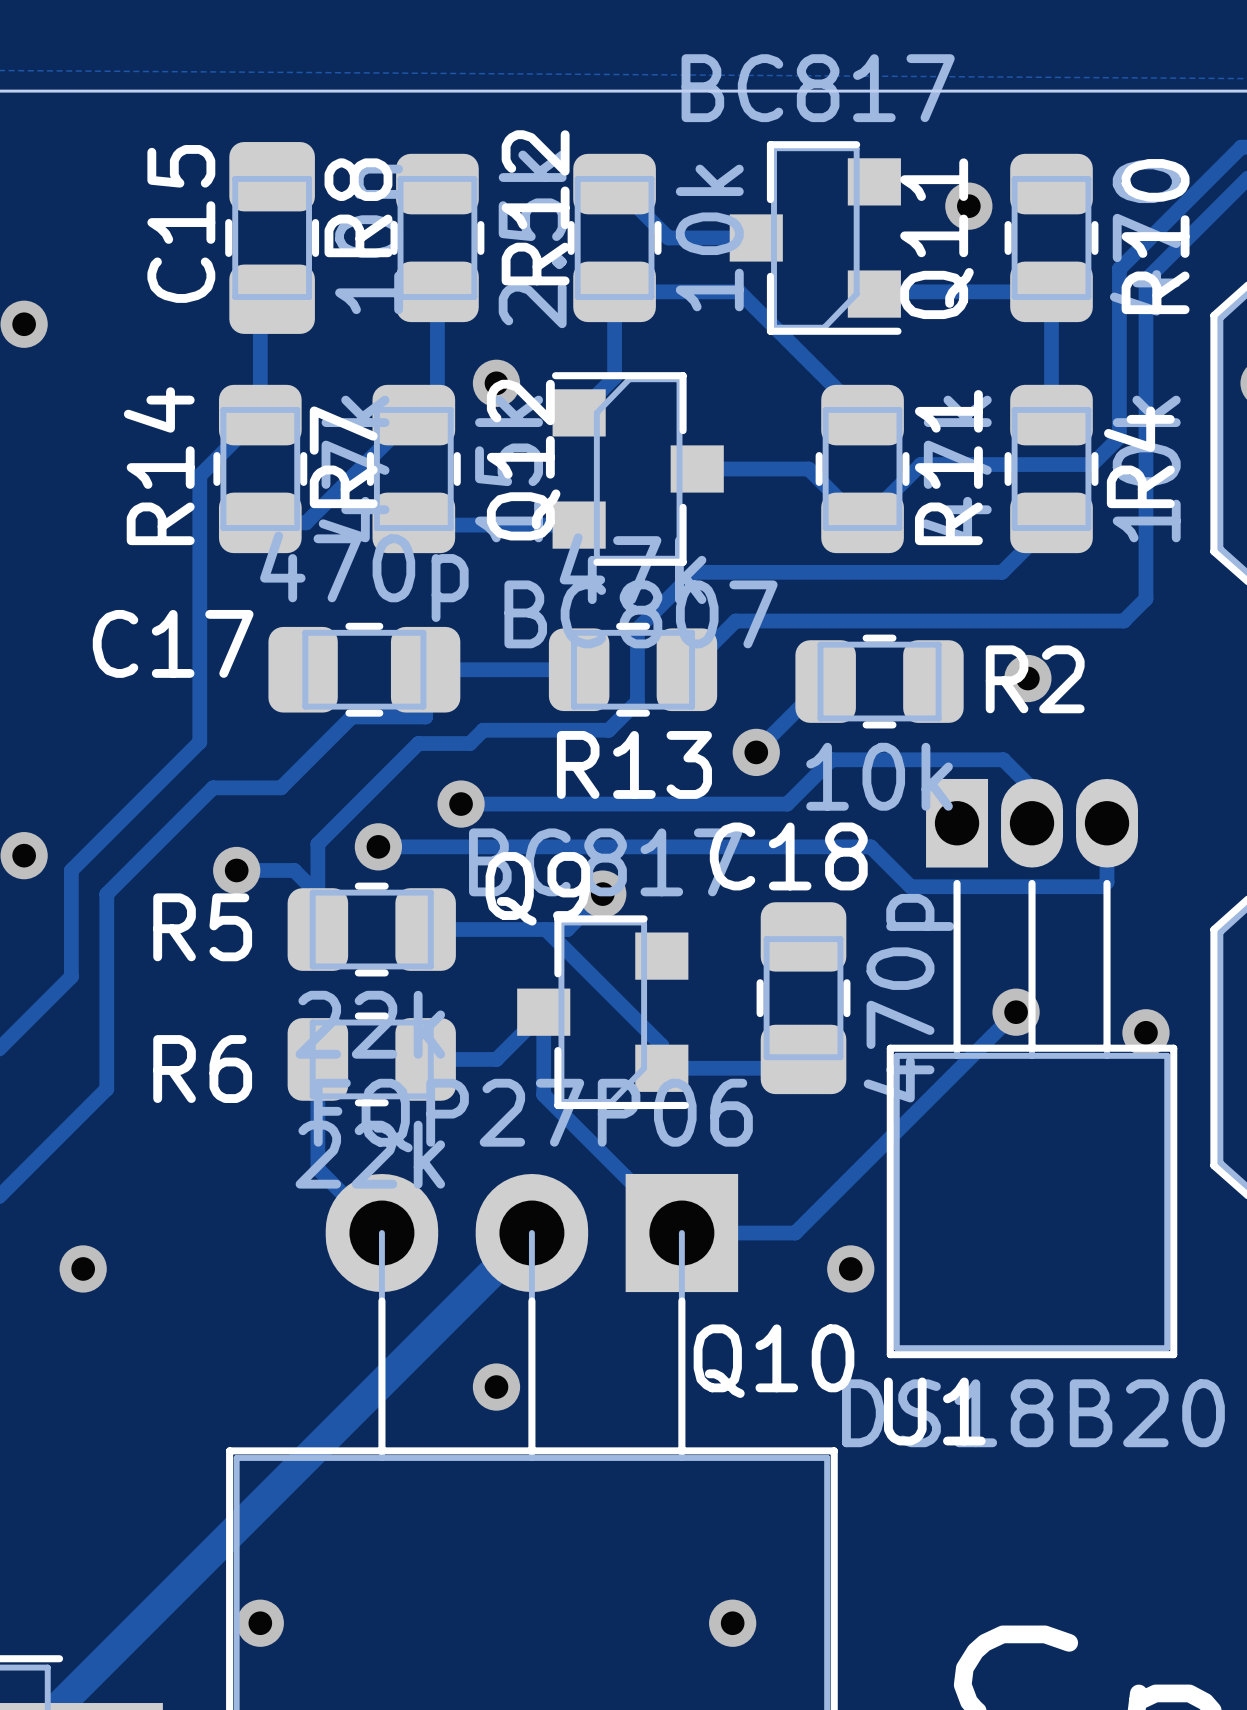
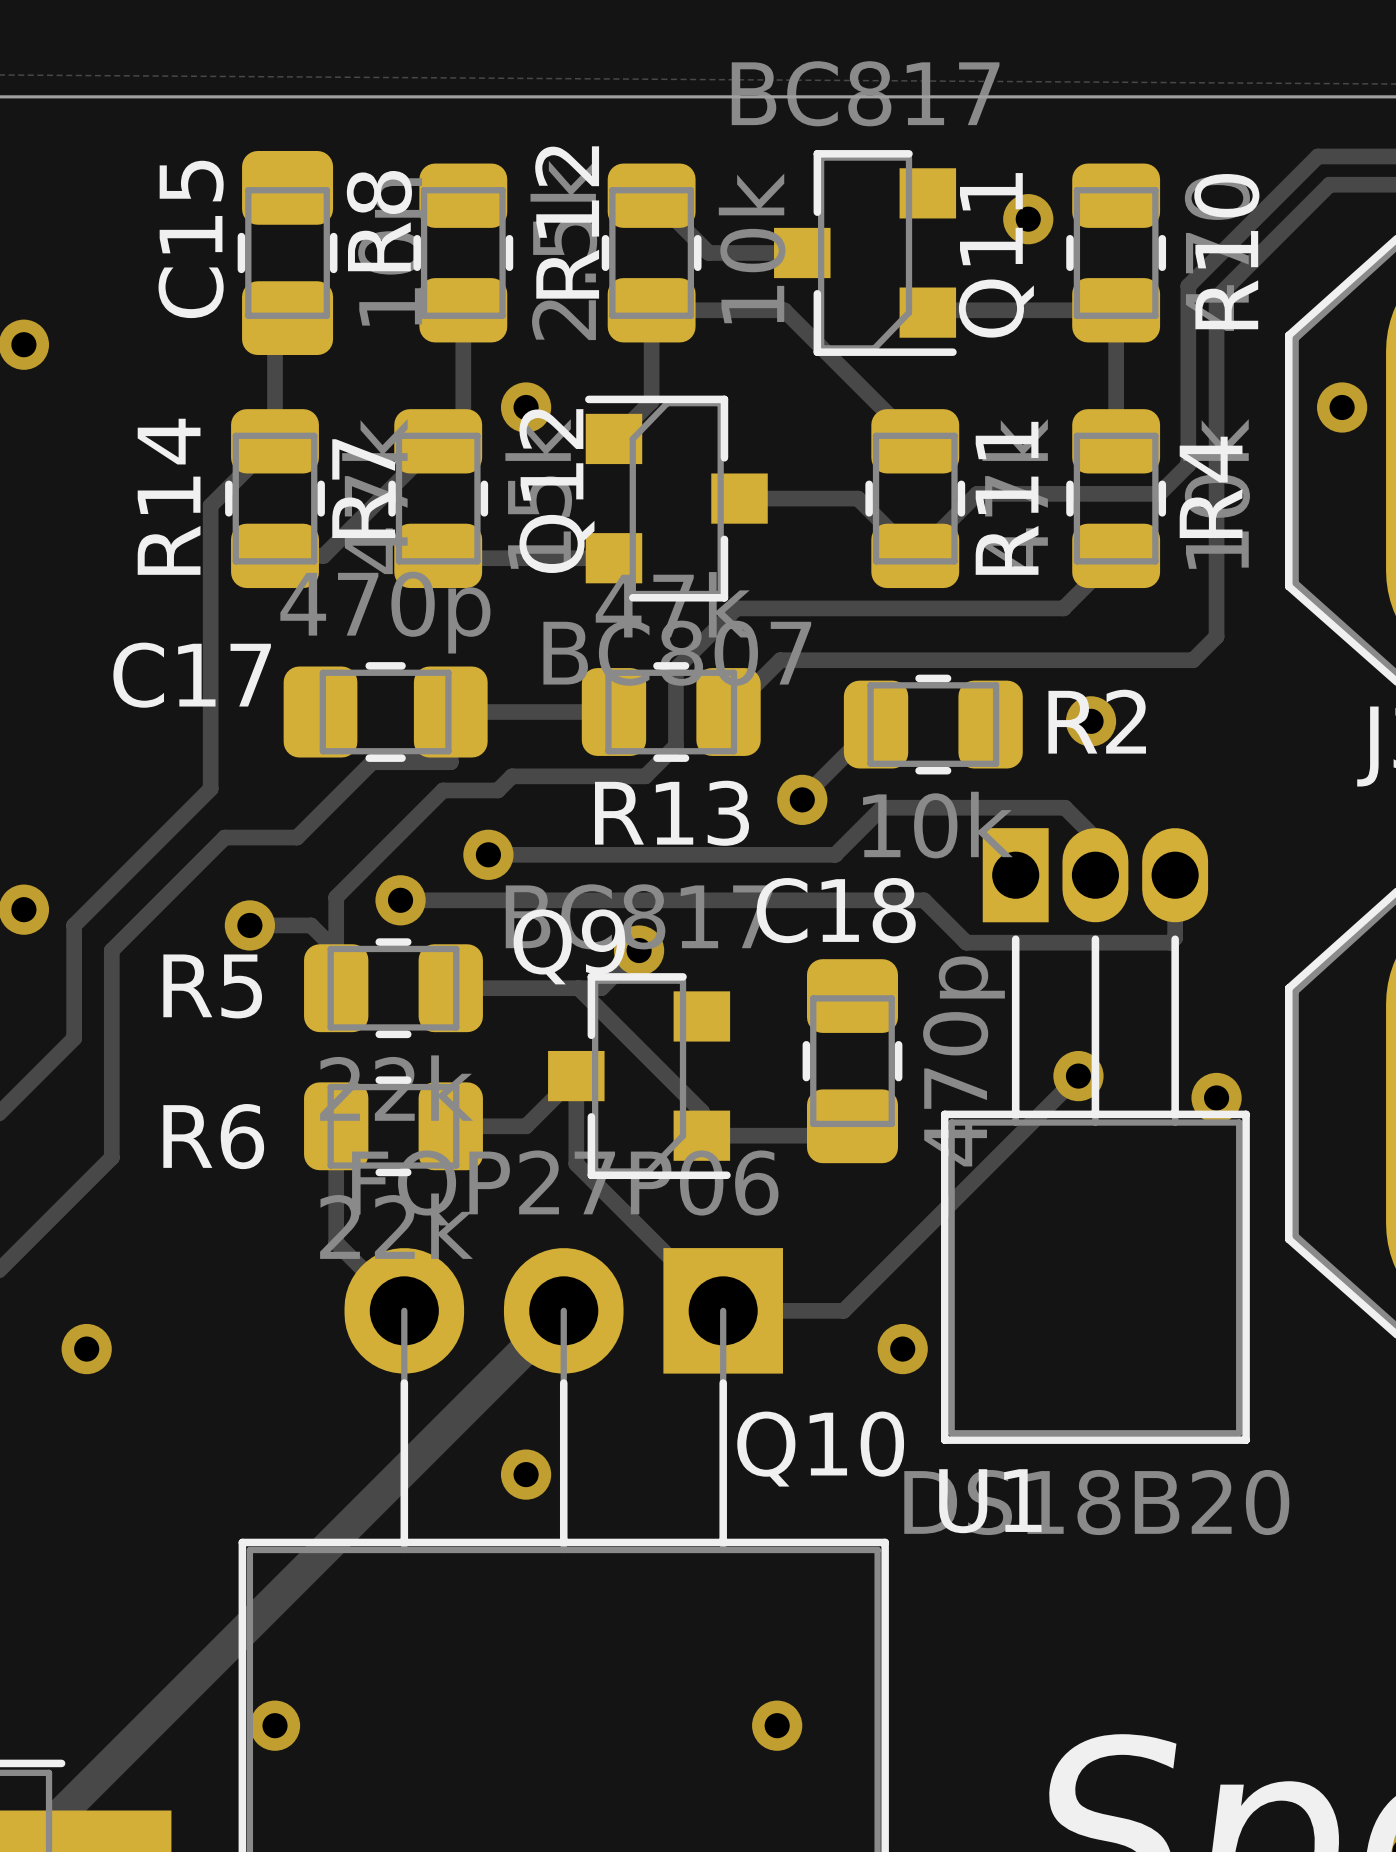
C17 name position: C17 (173, 643) -> C17 (192, 675)

